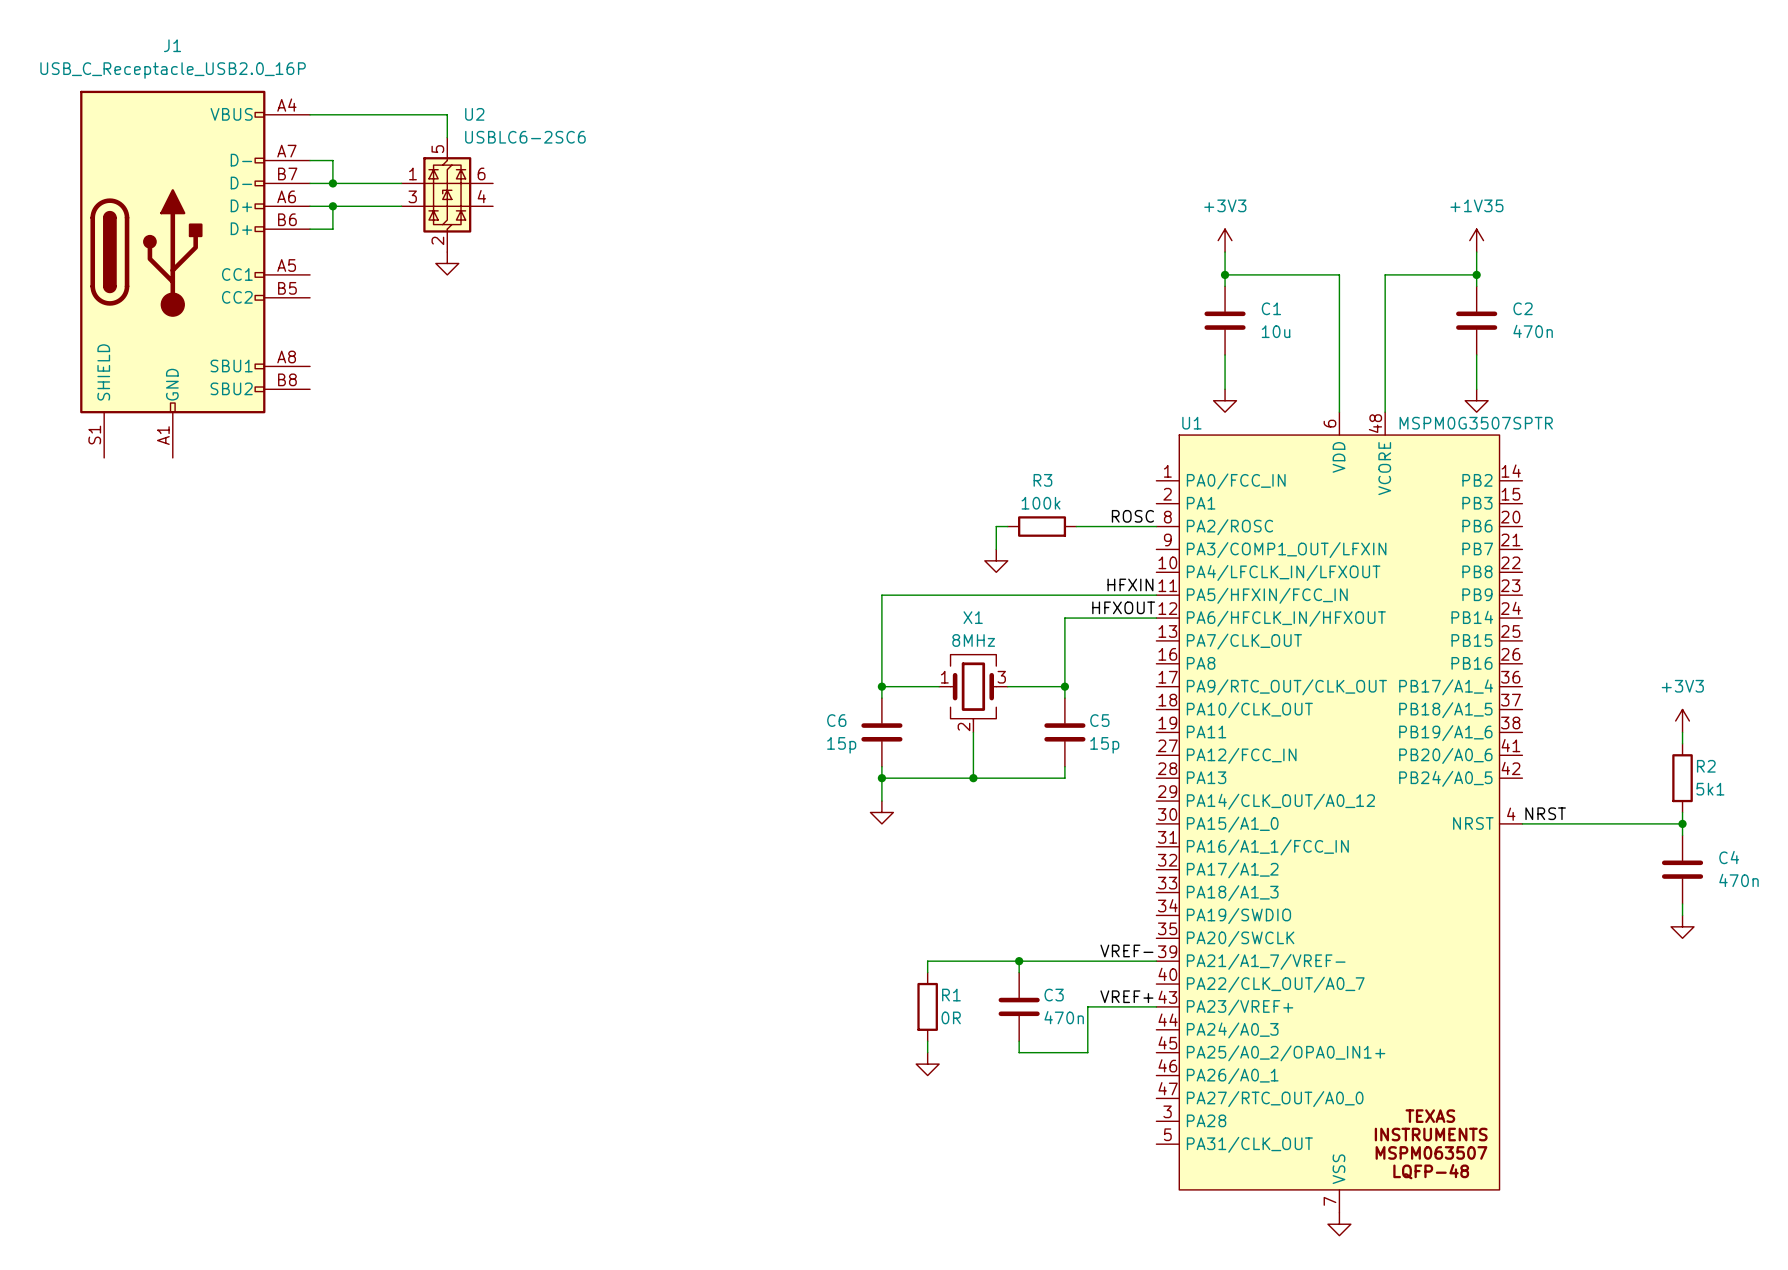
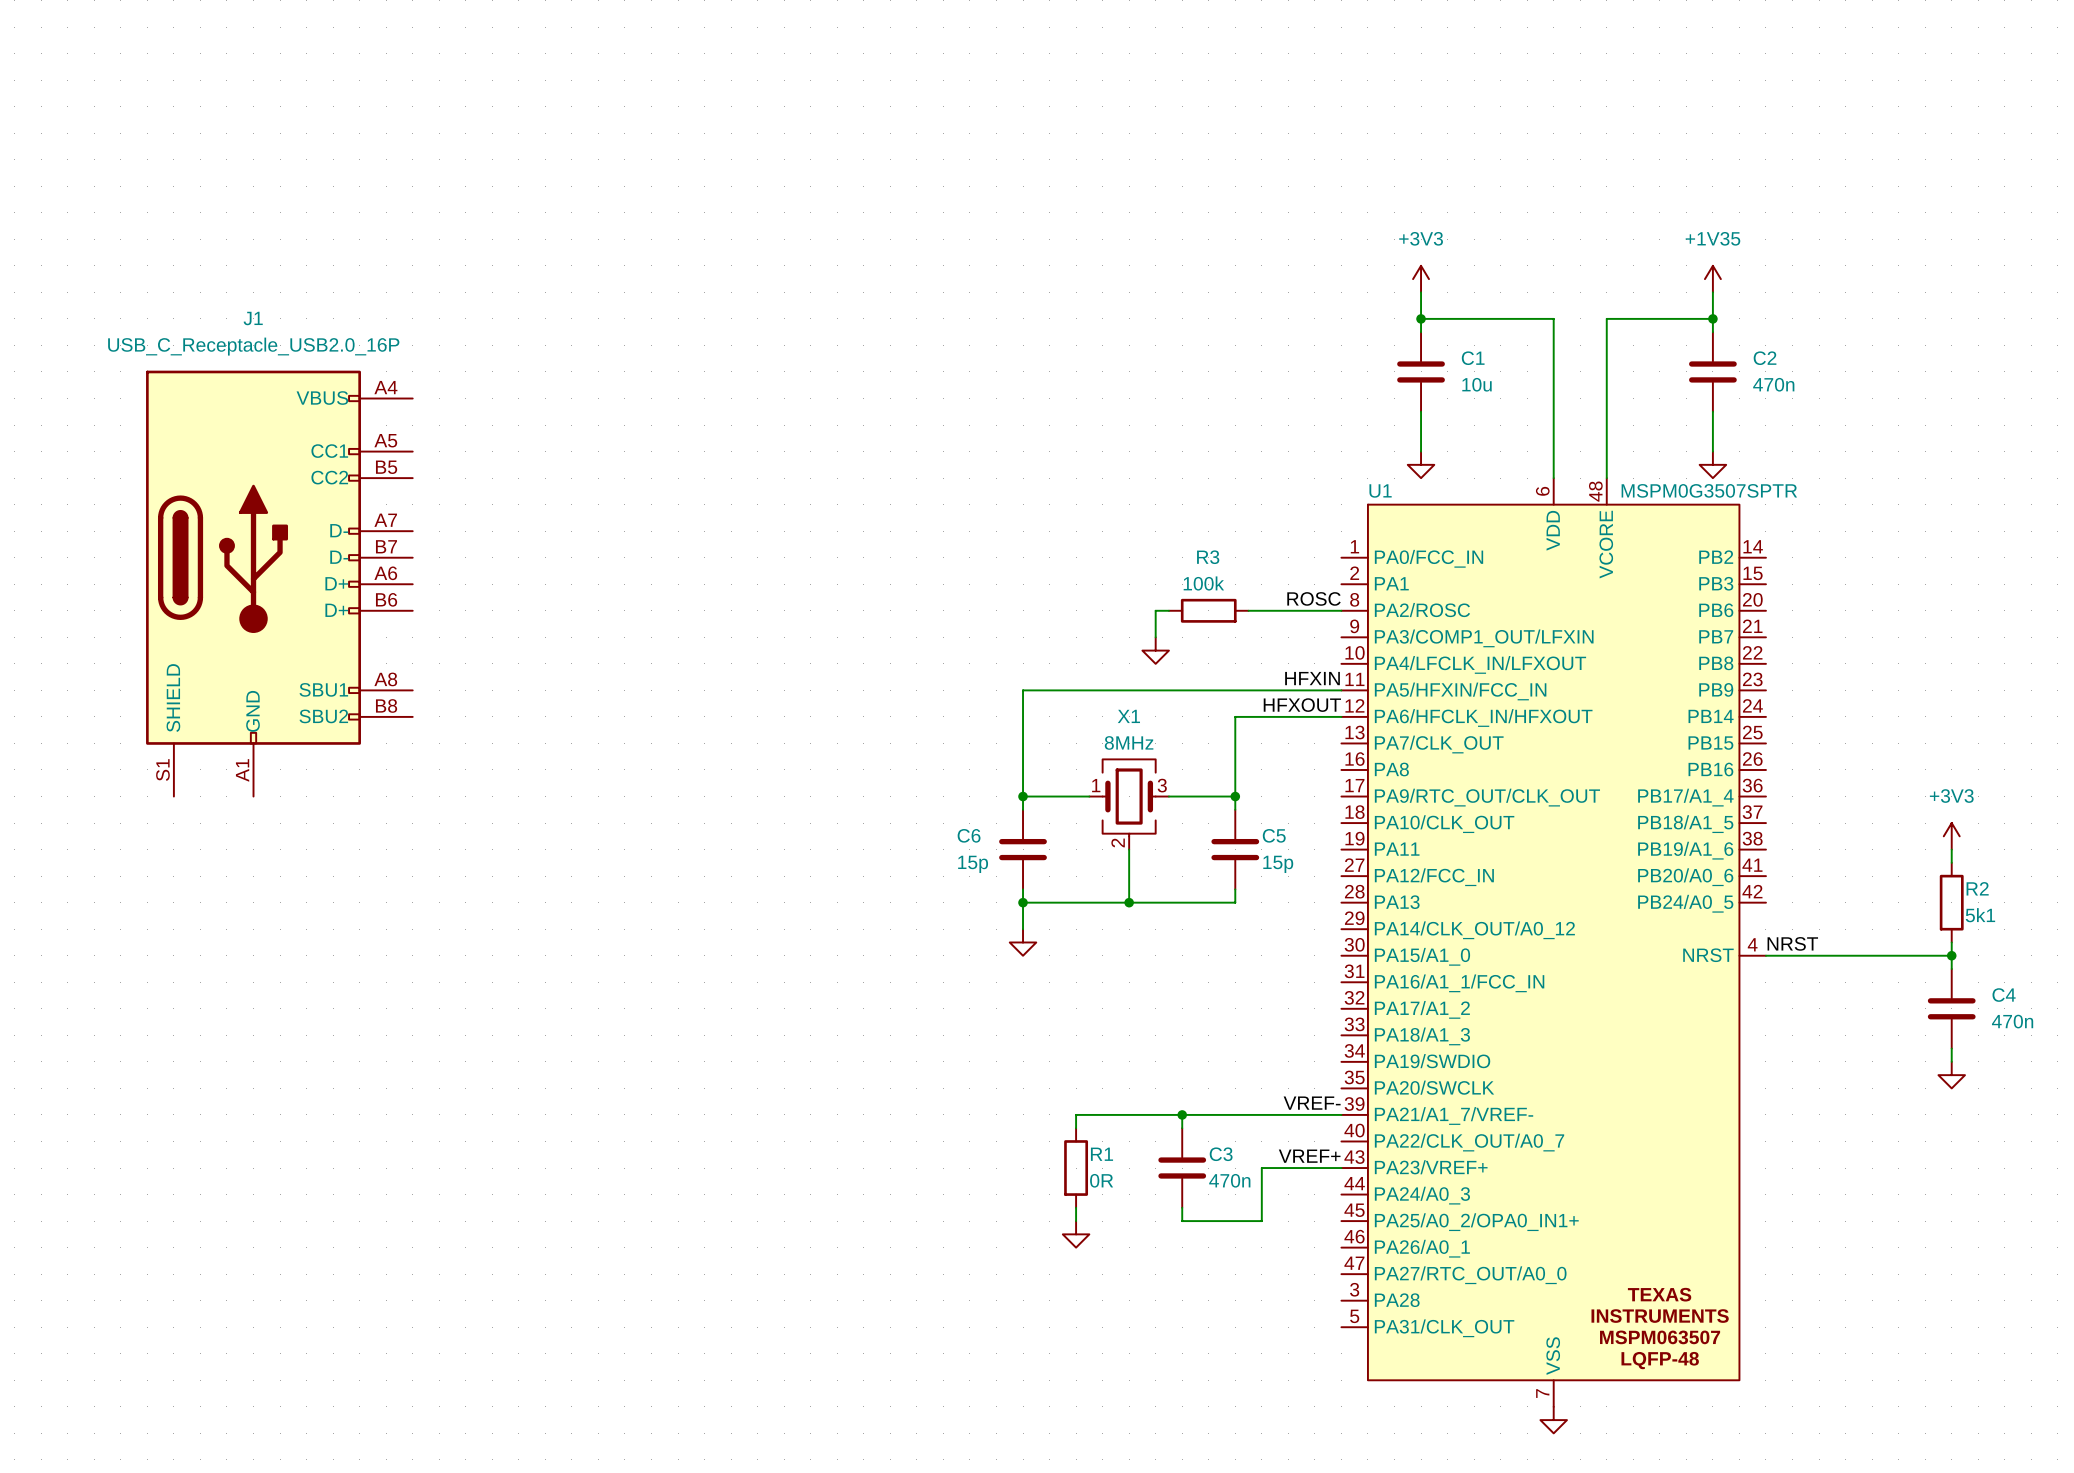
J1 symbol: [80, 90, 311, 458] -> [146, 370, 413, 797]
wire: (310, 114) (447, 114) (447, 137) -> none
wire: (310, 160) (332, 160) (332, 183) -> none
wire: (310, 183) (401, 183) -> none
junction: (332, 183) -> none
U2: USBLC6-2SC6 (447, 194) -> none
wire: (310, 206) (401, 206) -> none
wire: (332, 206) (332, 229) (310, 229) -> none
junction: (332, 206) -> none
power symbol: (447, 263) -> none

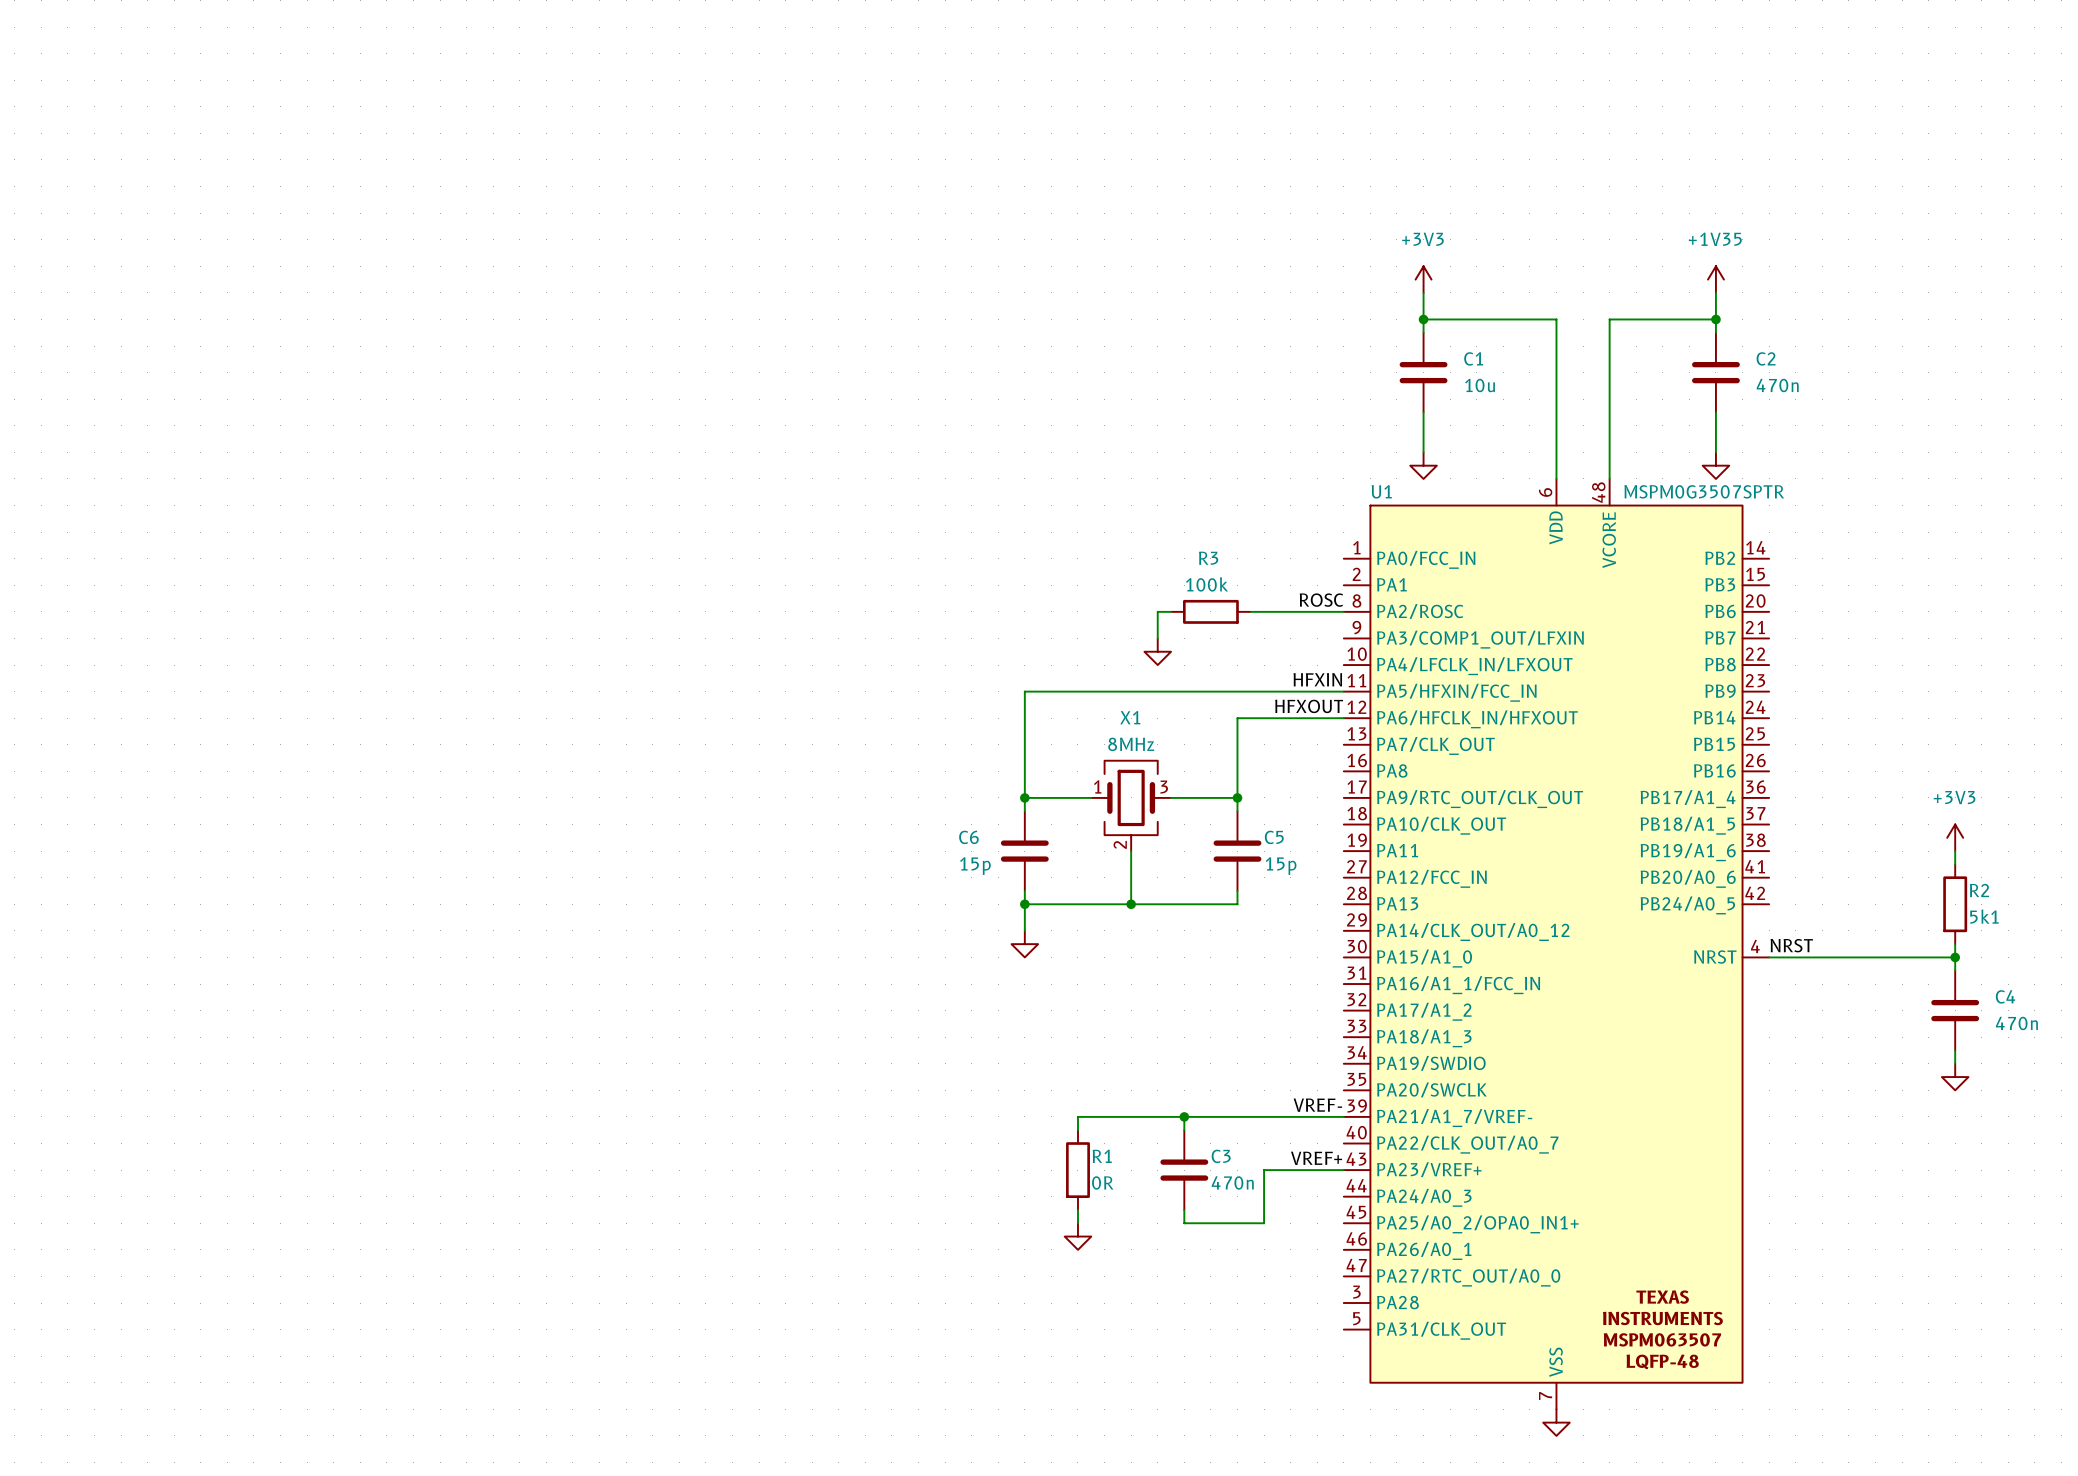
J1: USB_C_Receptacle_USB2.0_16P (279, 583) -> none

